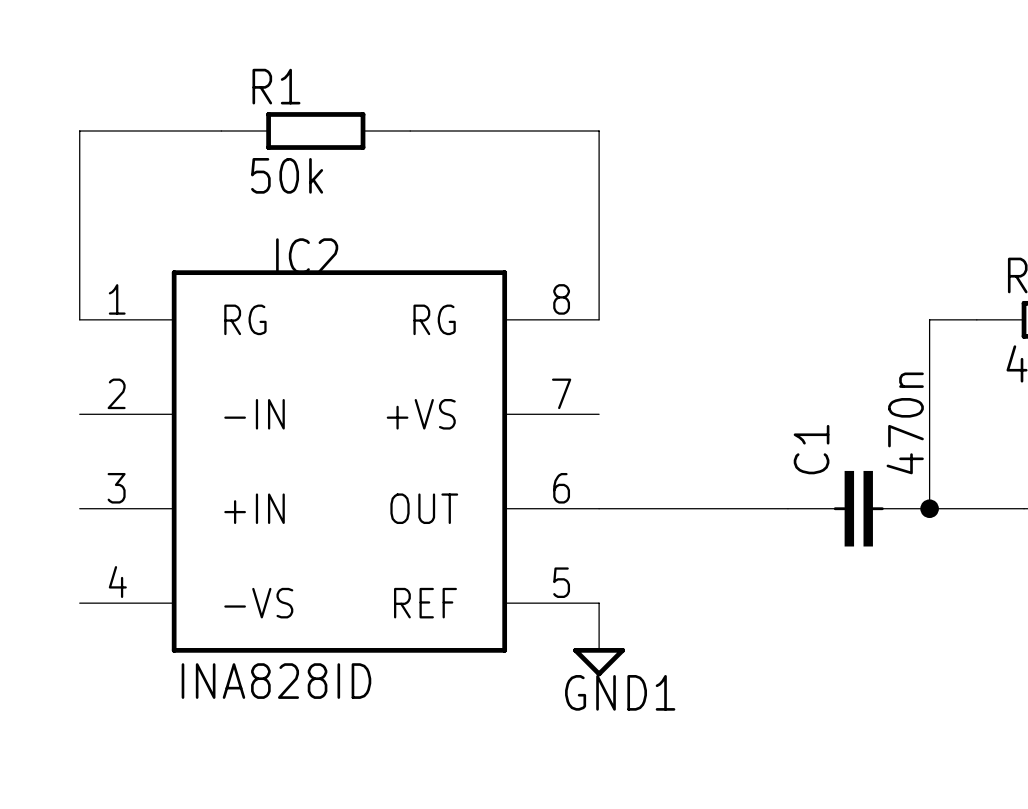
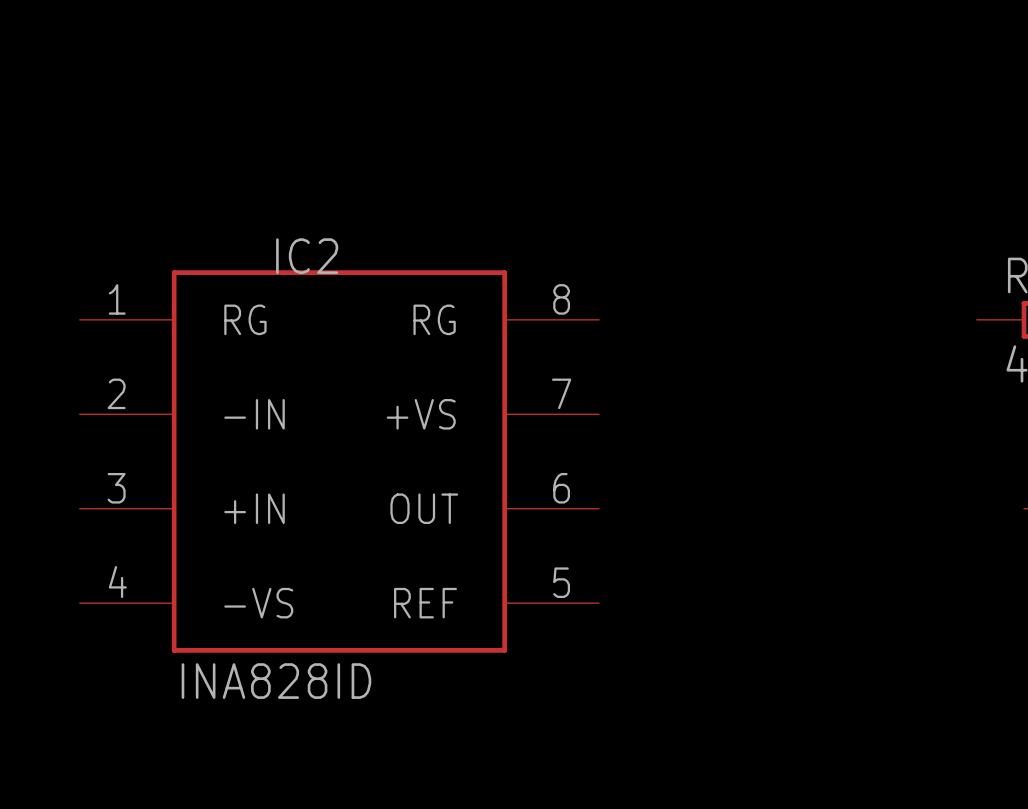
wire: (221, 130) (79, 130) (79, 319) -> none
R1: 50k (315, 130) -> none
wire: (410, 130) (599, 130) (599, 319) -> none
wire: (976, 319) (929, 319) (929, 508) (1024, 508) -> none
wire: (599, 508) (787, 508) -> none
C1: 470n (858, 508) -> none
junction: (929, 508) -> none
power symbol: GND1 (599, 639) -> none

